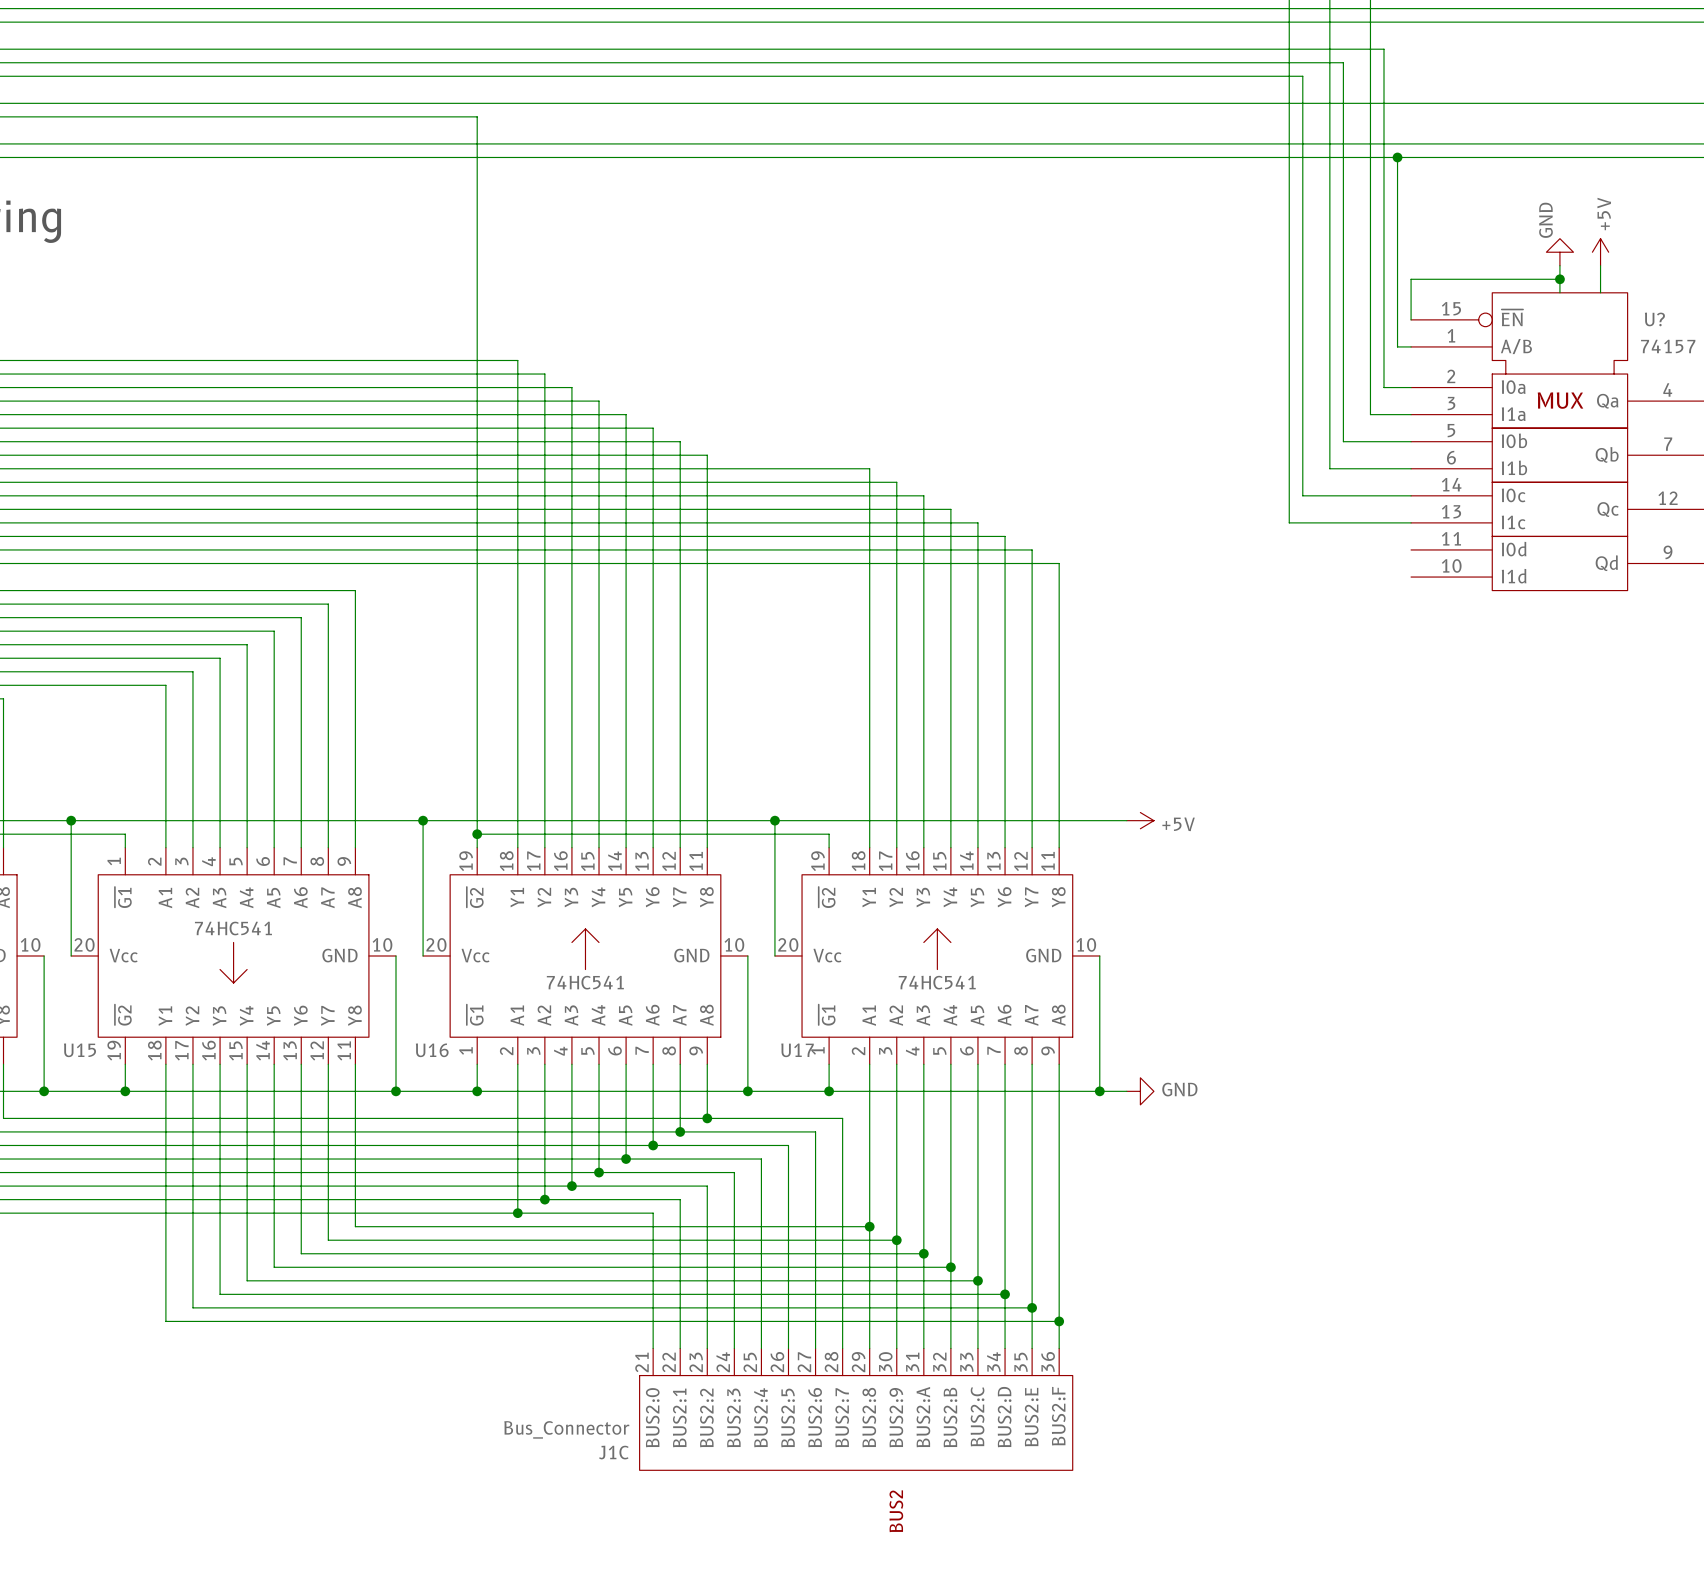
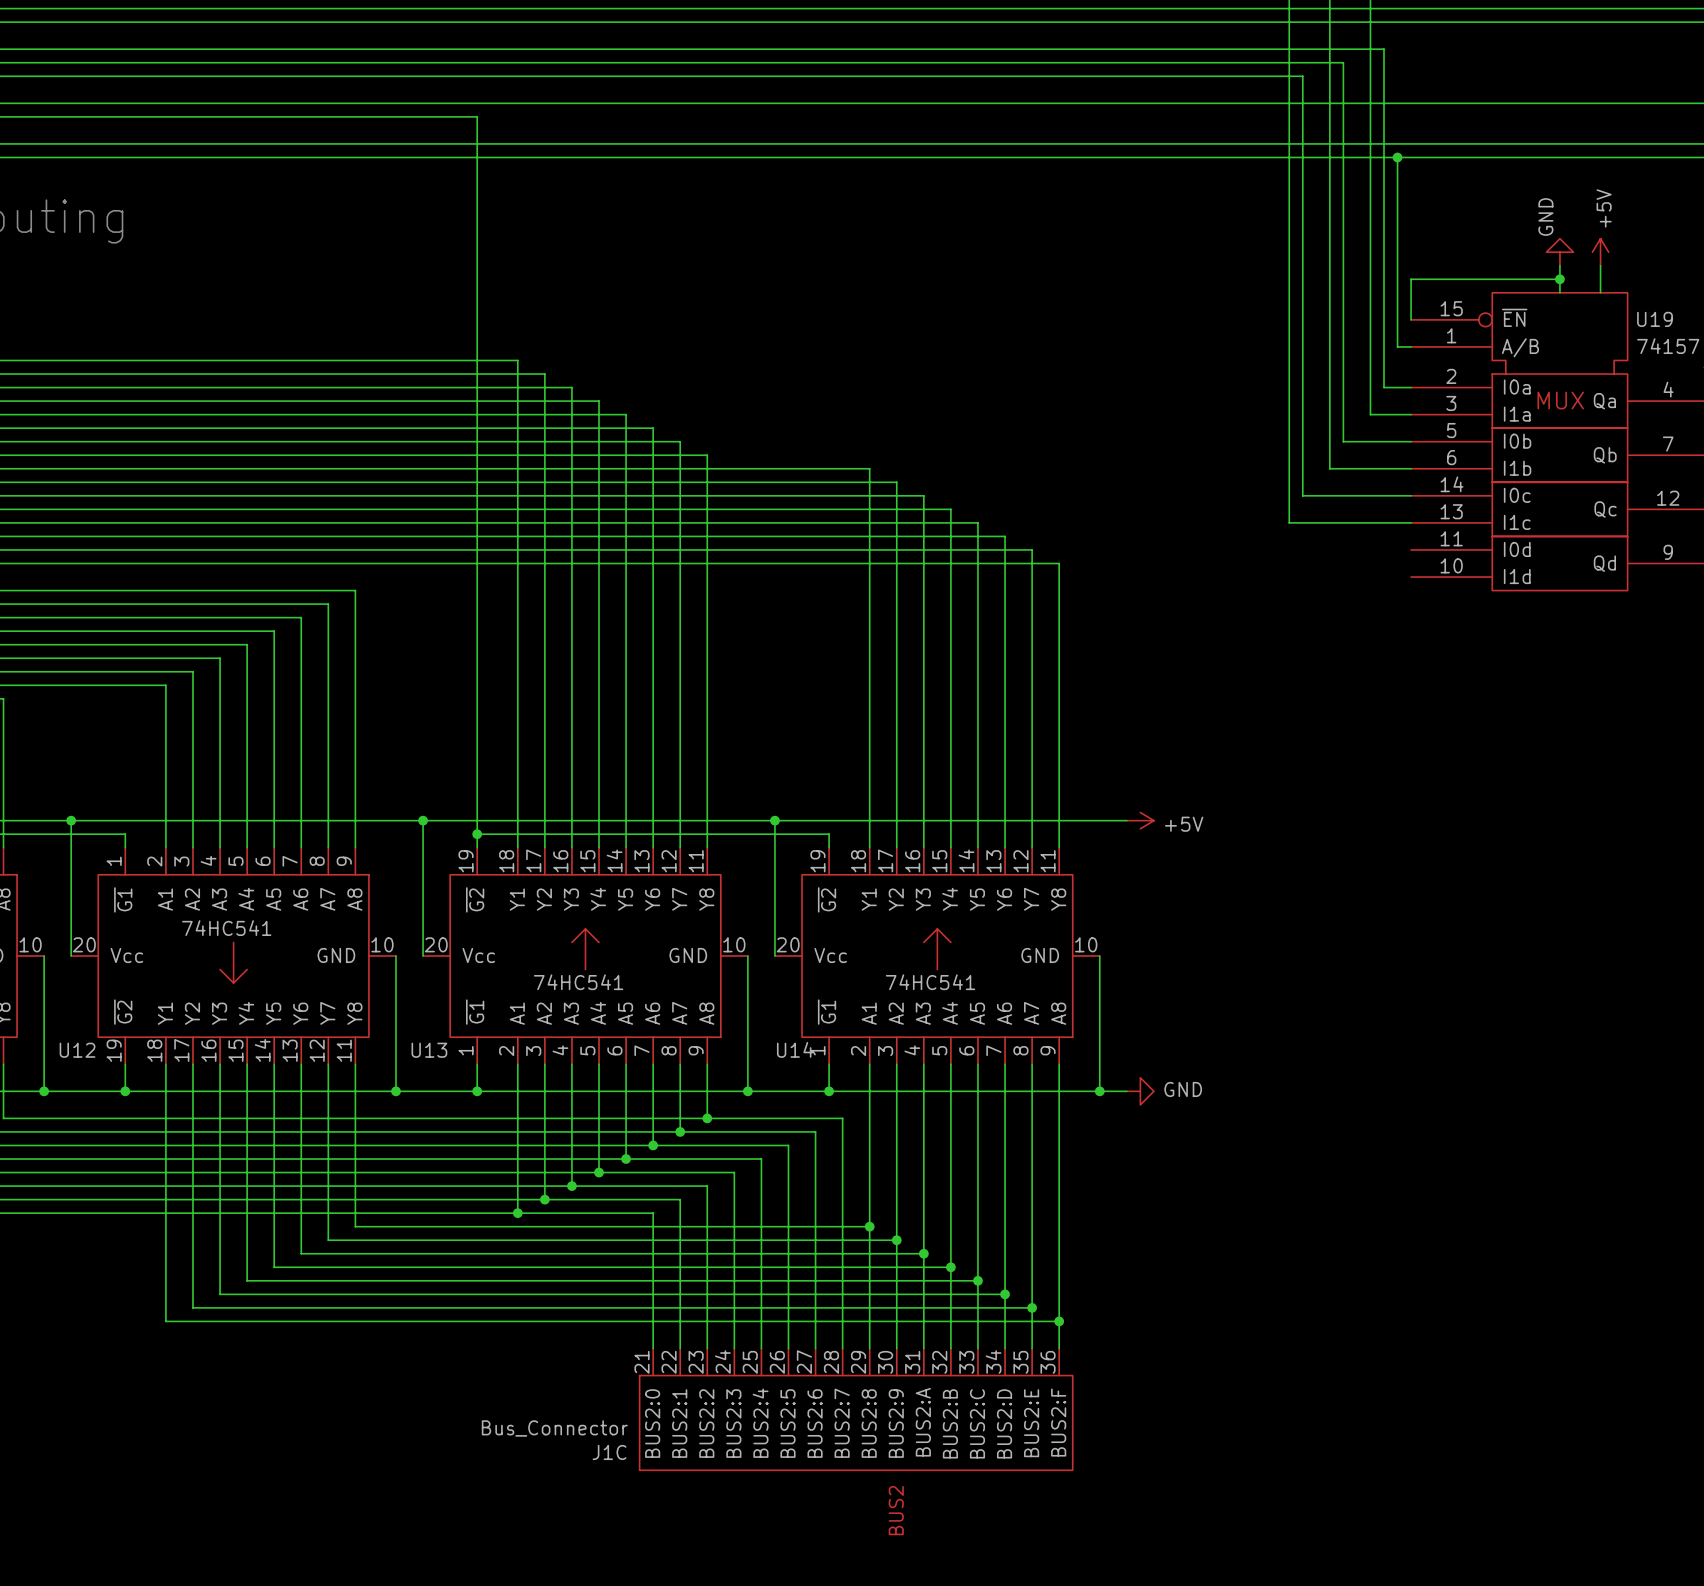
U? name: U? (1654, 319) -> U19 (1655, 319)
U15 name: U15 (79, 1050) -> U12 (77, 1050)
U16 name: U16 (432, 1050) -> U13 (429, 1050)
U17 name: U17 (797, 1050) -> U14 (795, 1049)

